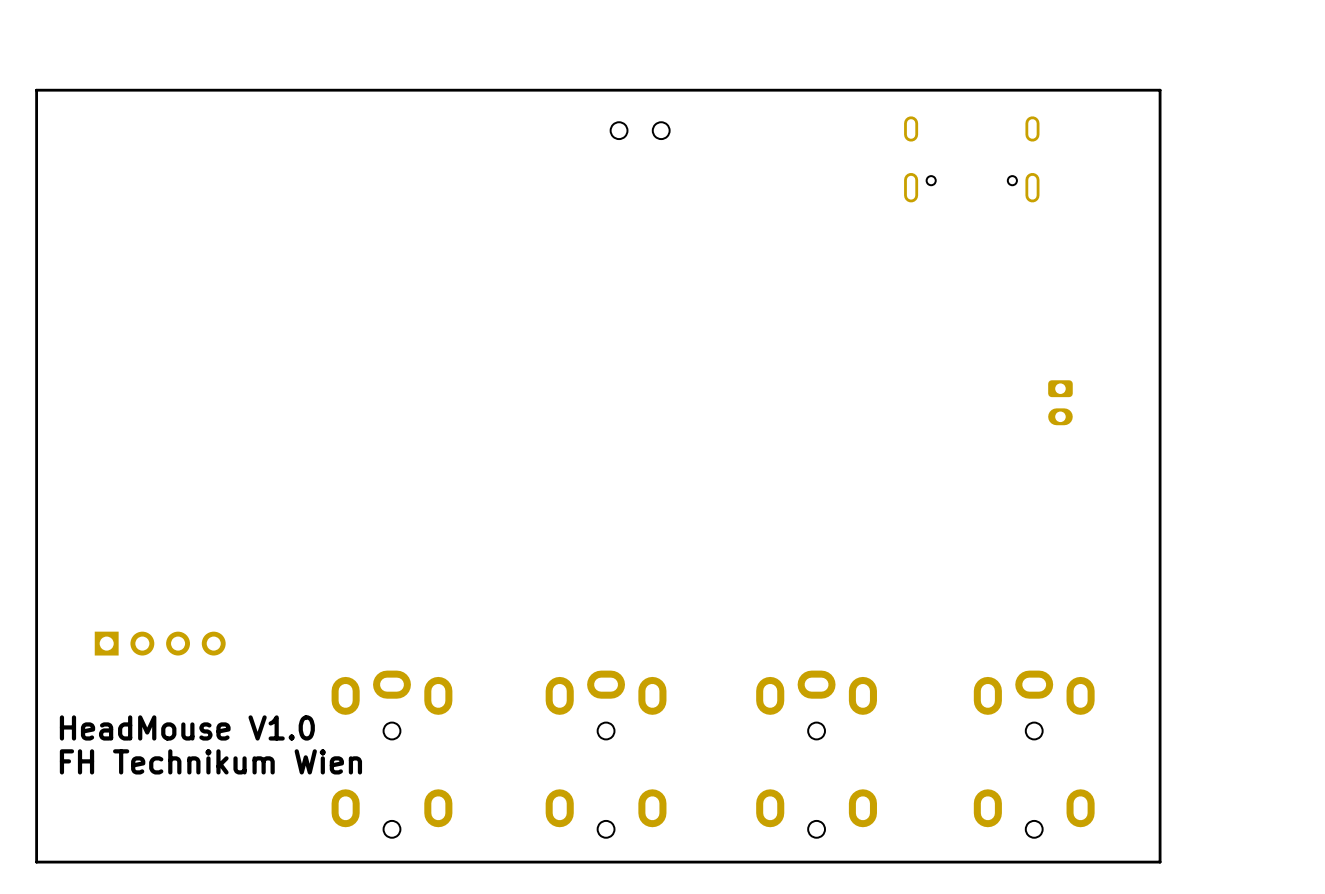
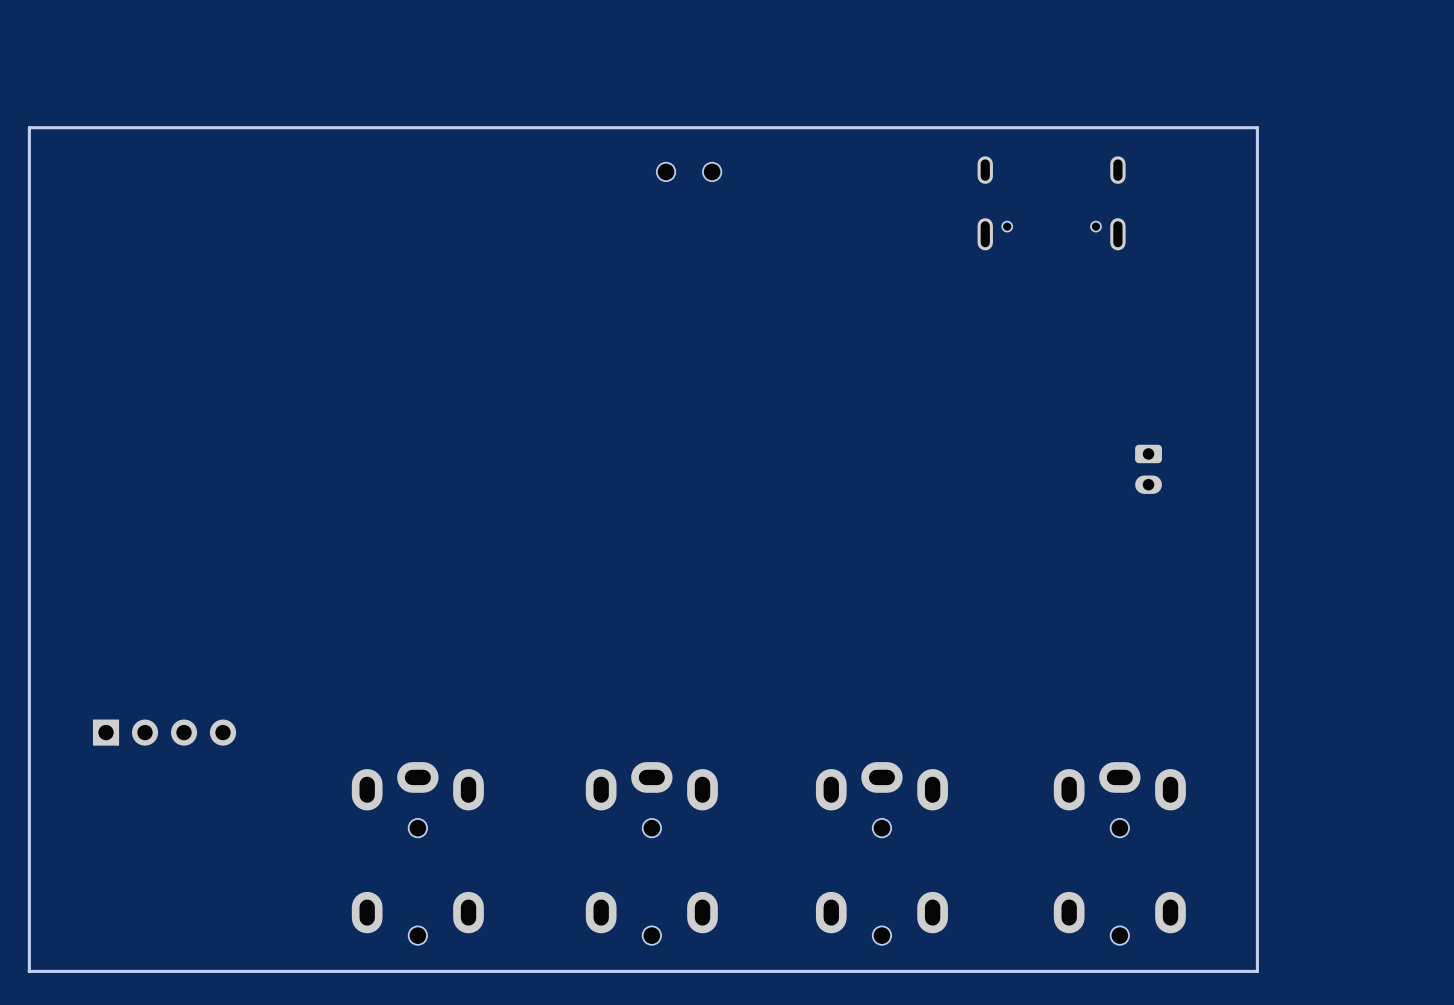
text: HeadMouse V1.0 (187, 727) -> none
text: FH Technikum Wien (210, 761) -> none

